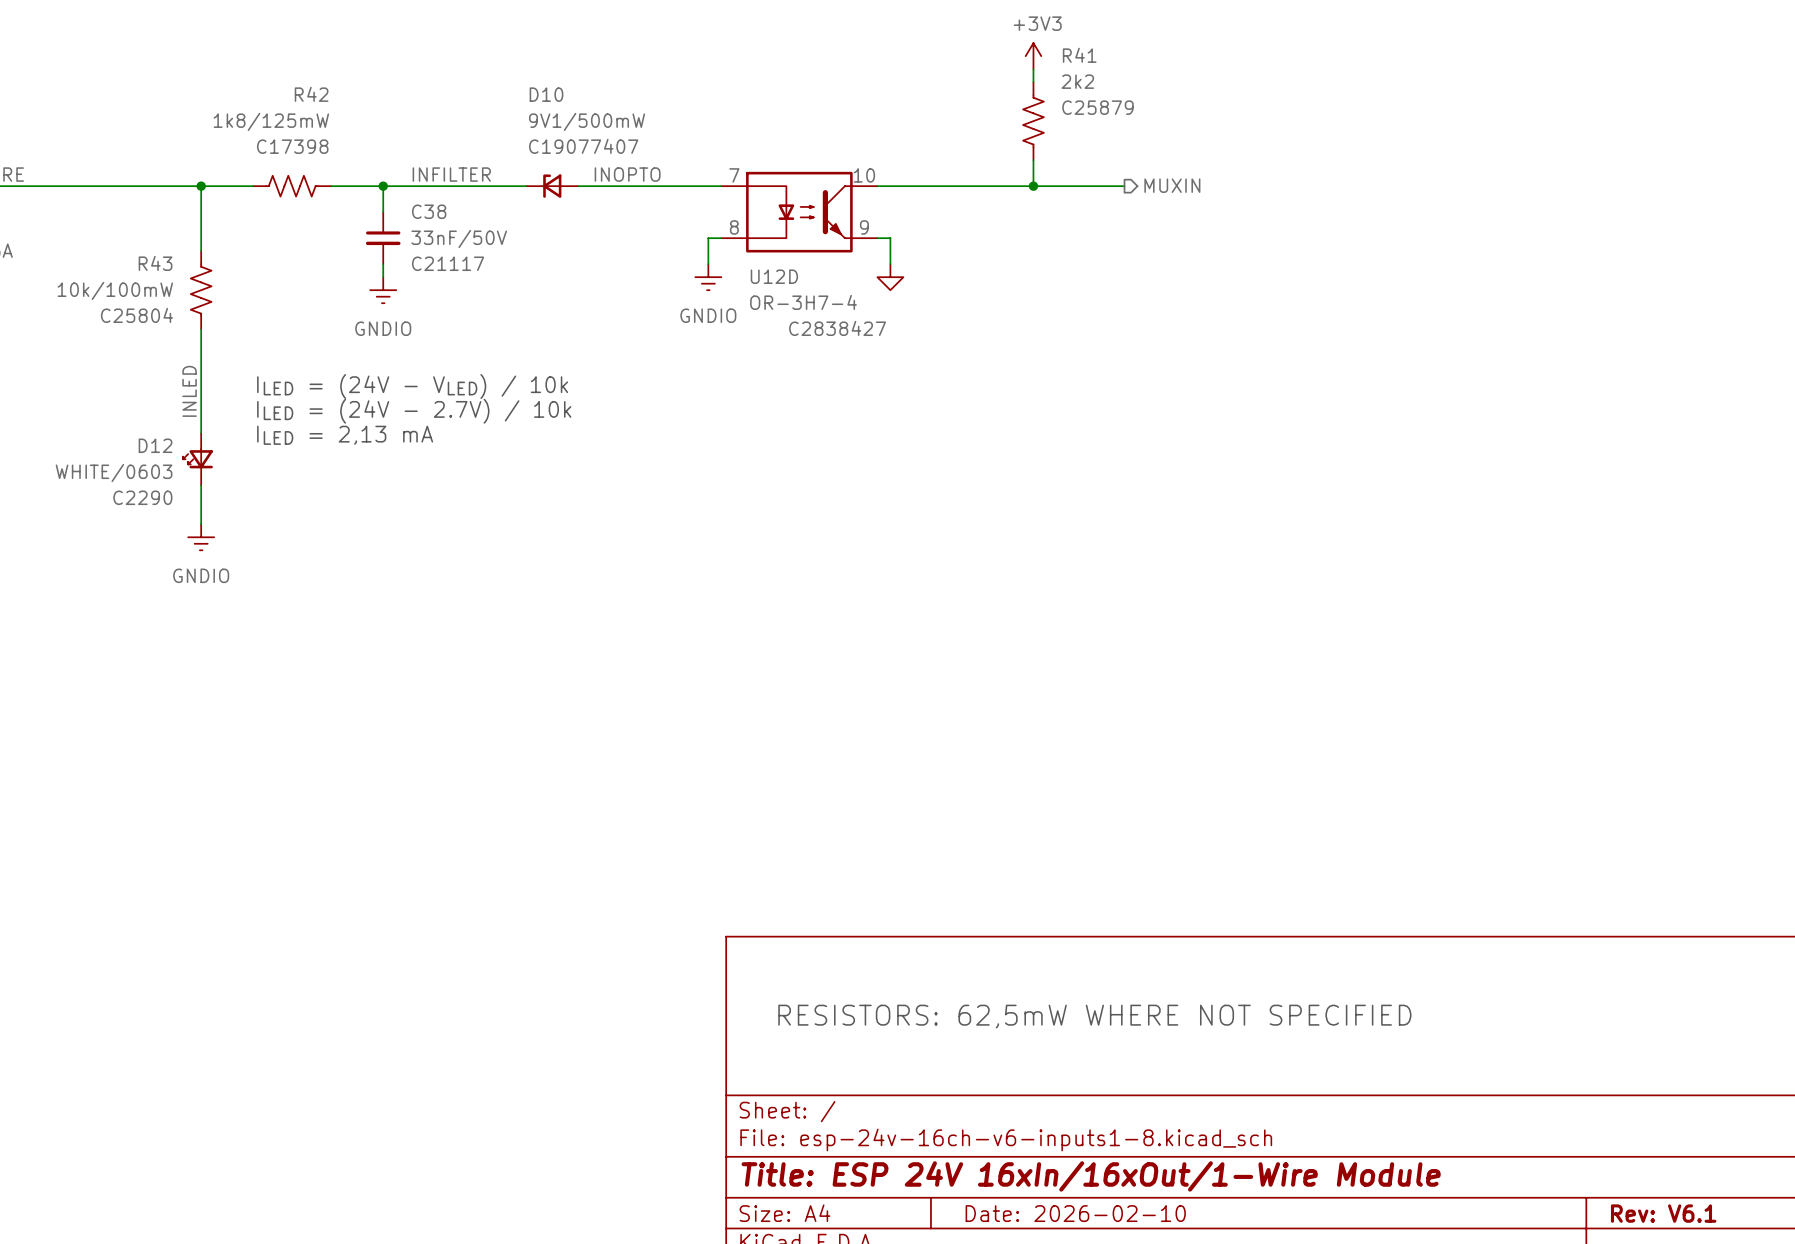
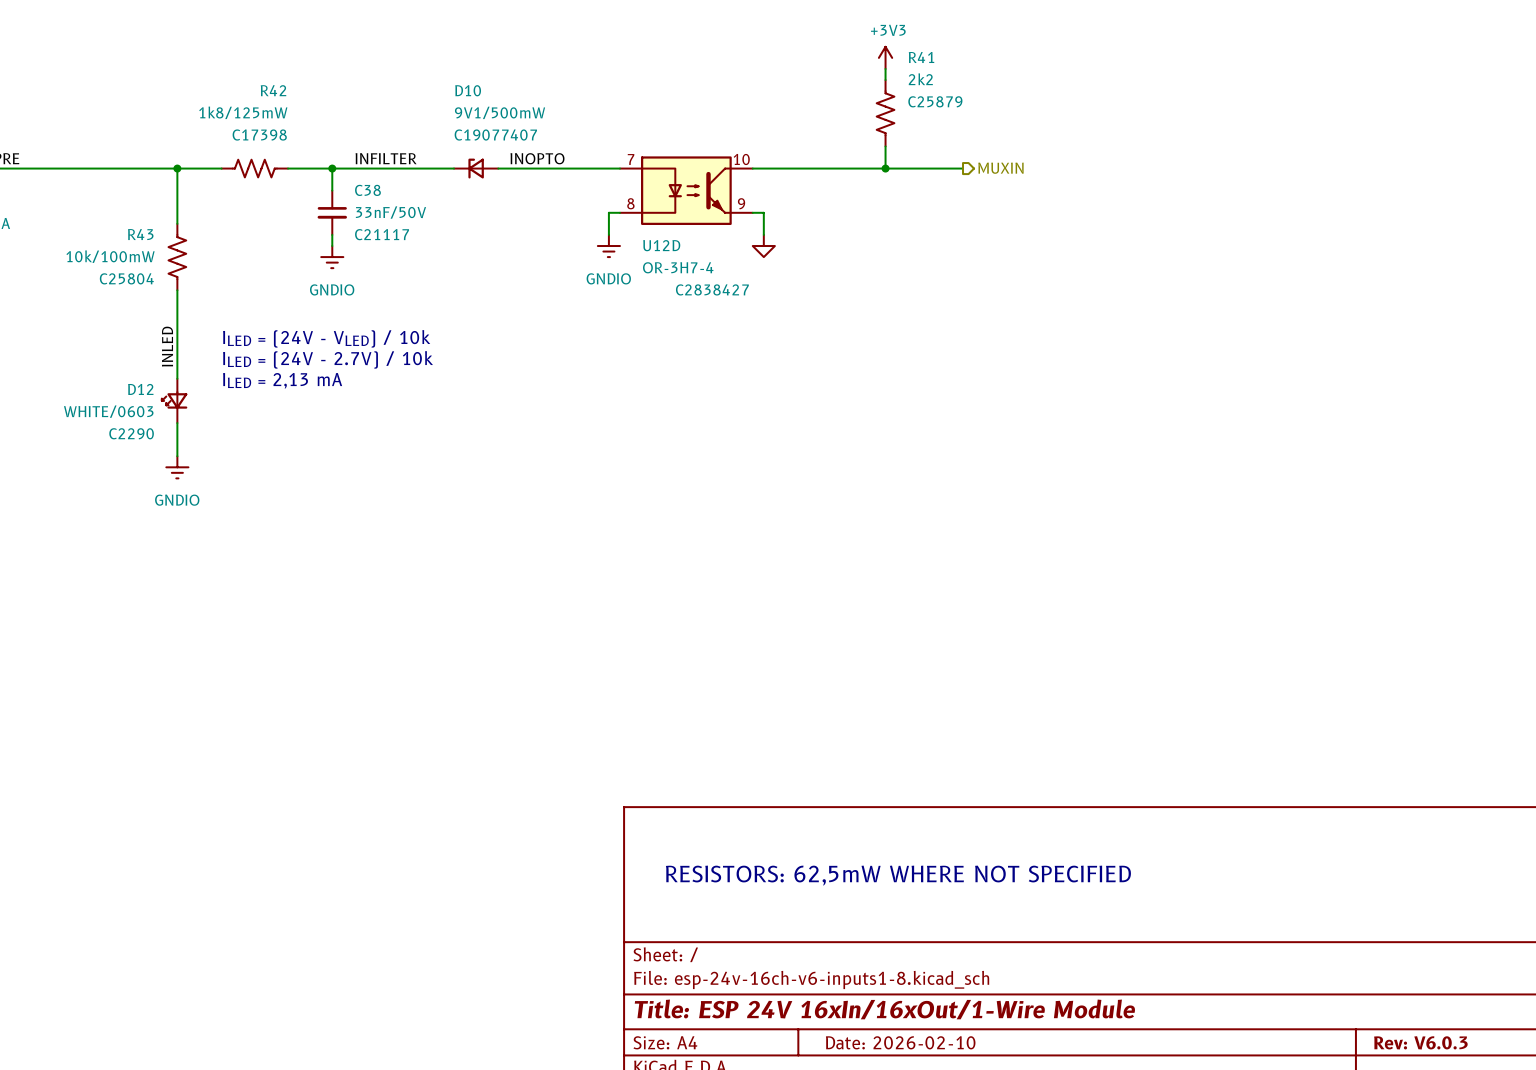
title block: Rev: V6.1 (1663, 1213) -> Rev: V6.0.3 (1420, 1042)

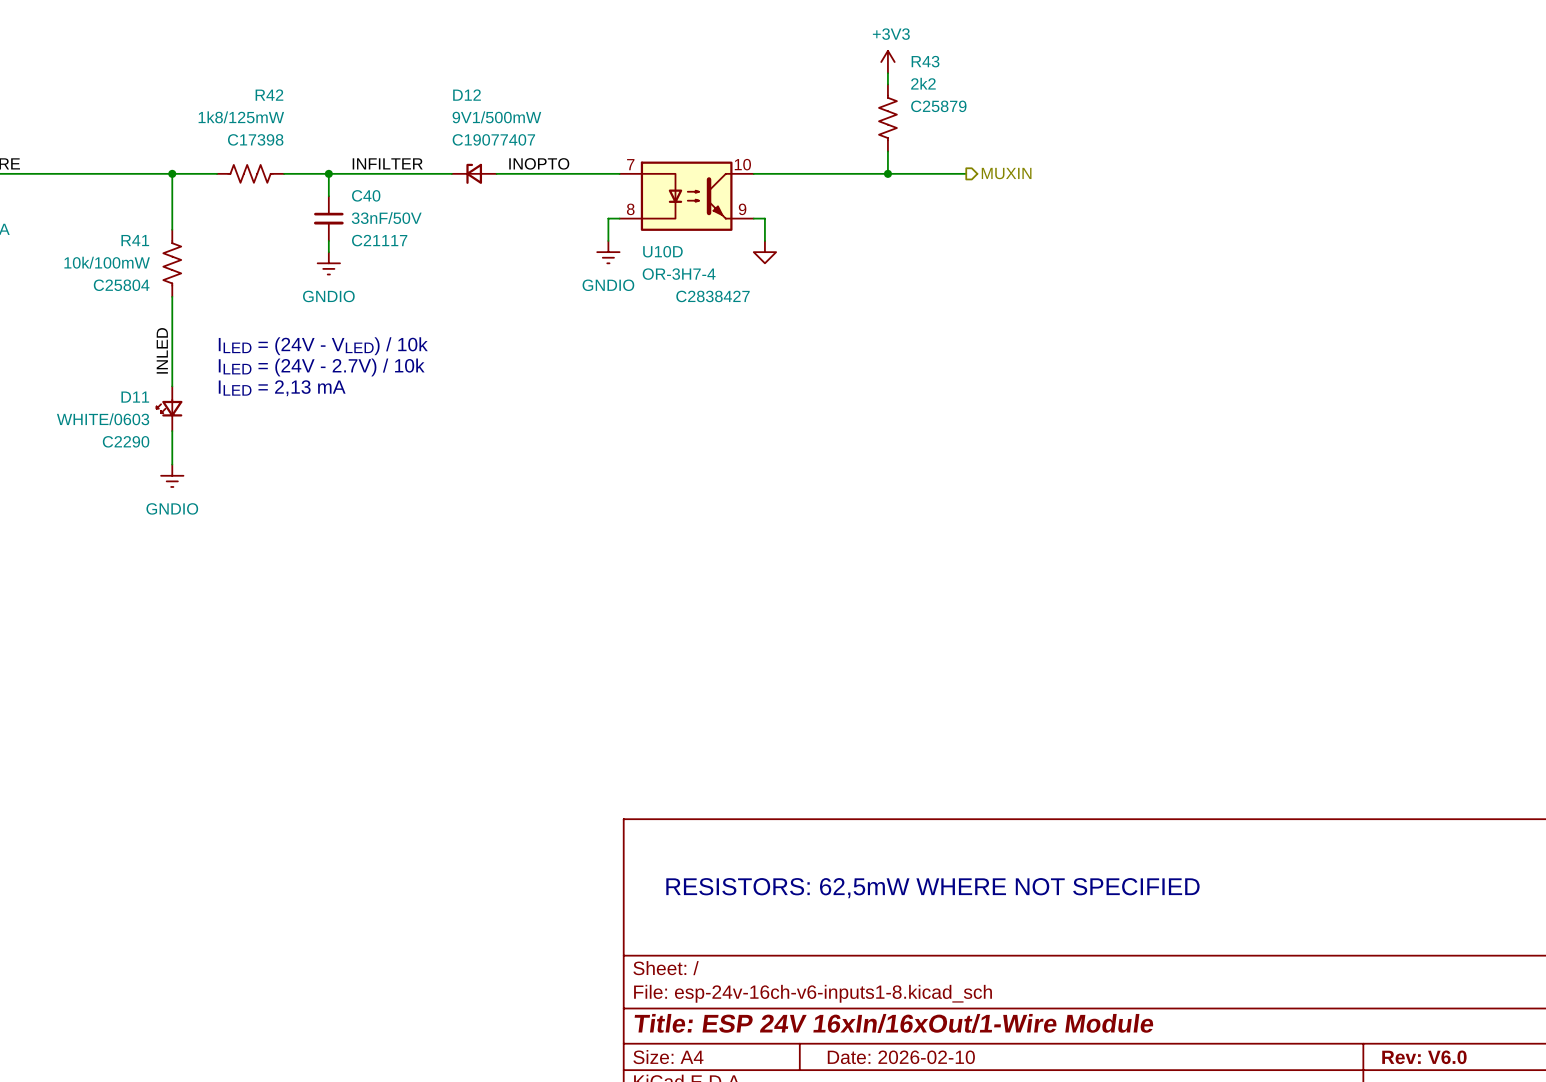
R41 name: R41 (921, 57) -> R43 (925, 61)
D10 name: D10 (468, 90) -> D12 (467, 95)
C38 name: C38 (367, 190) -> C40 (366, 195)
R43 name: R43 (140, 234) -> R41 (135, 240)
U12D name: U12D (661, 245) -> U10D (662, 251)
D12 name: D12 (140, 389) -> D11 (135, 397)
title block: Rev: V6.0.3 (1420, 1042) -> Rev: V6.0 (1424, 1057)

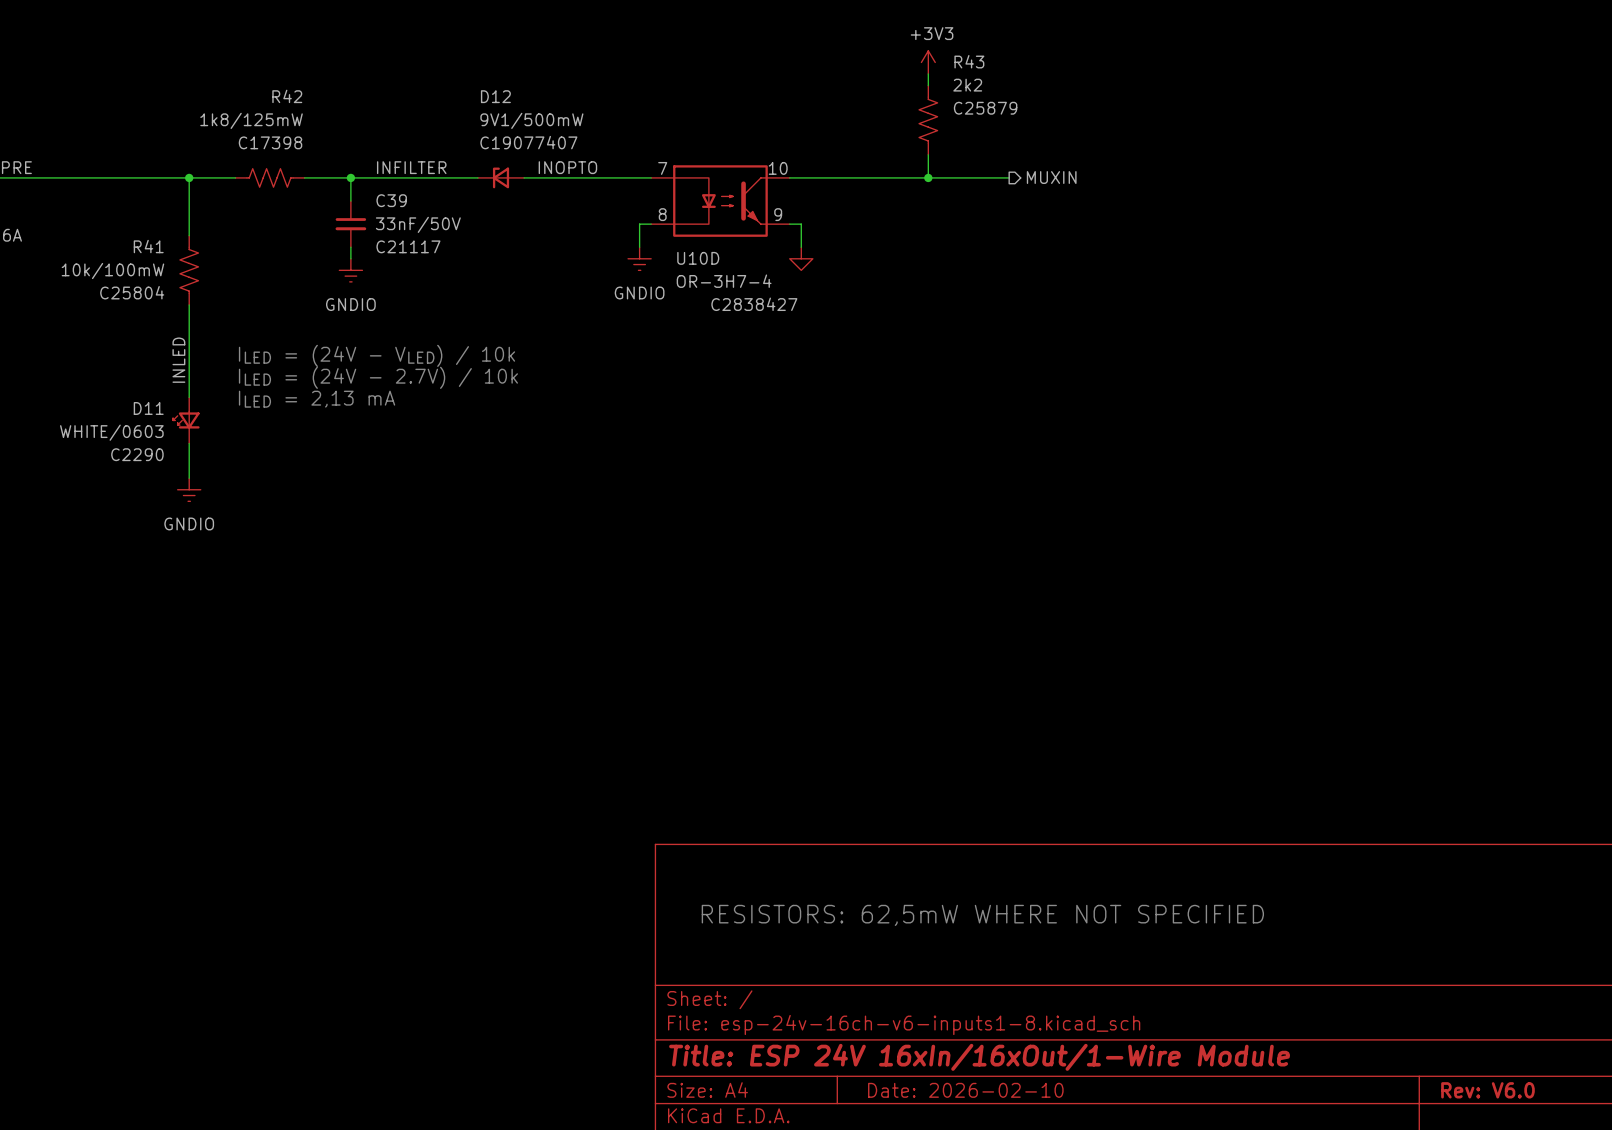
C40 name: C40 (366, 195) -> C39 (391, 200)

